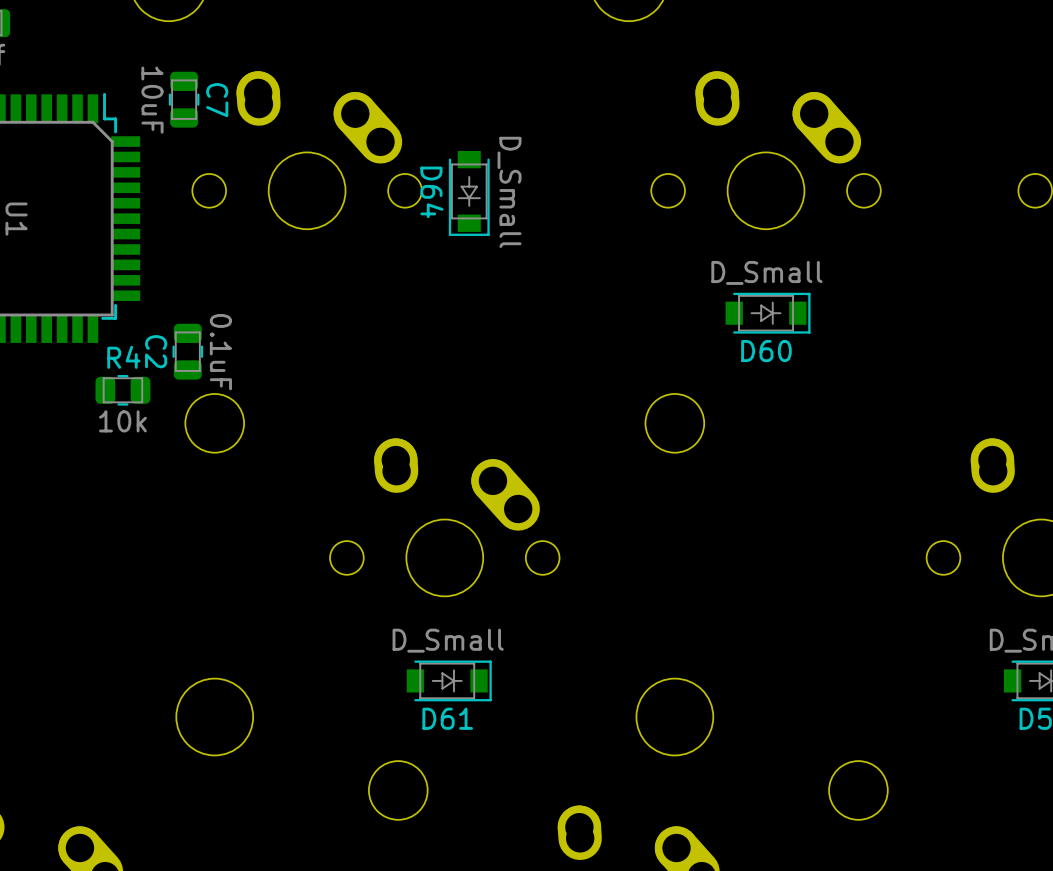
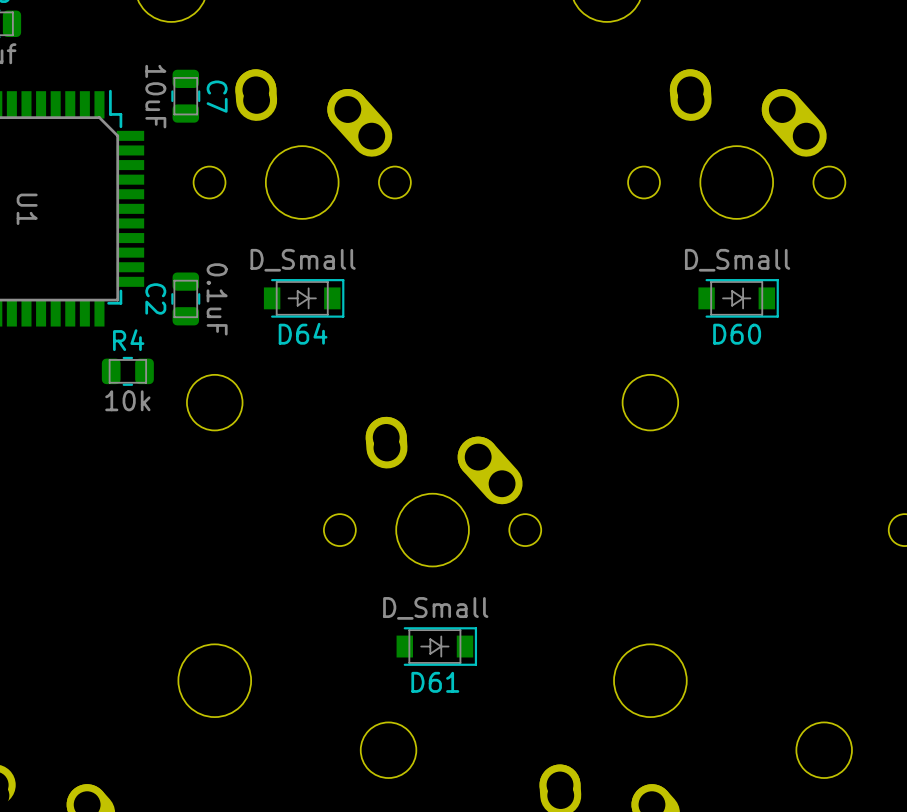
D64 rotation: 0° (469, 193) -> 90° counterclockwise (304, 298)
D64 position: (469, 193) -> (304, 298)
C2 position: (187, 351) -> (185, 298)

